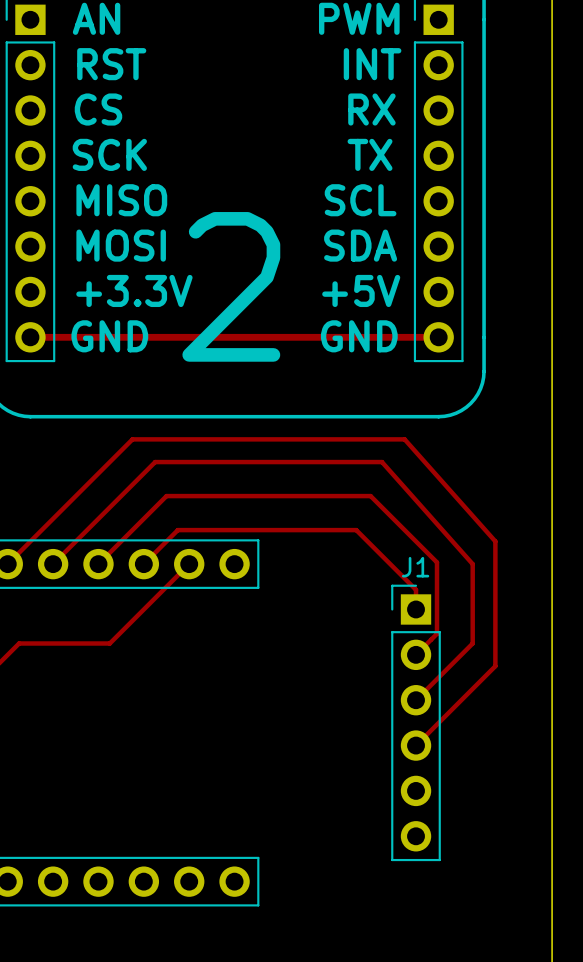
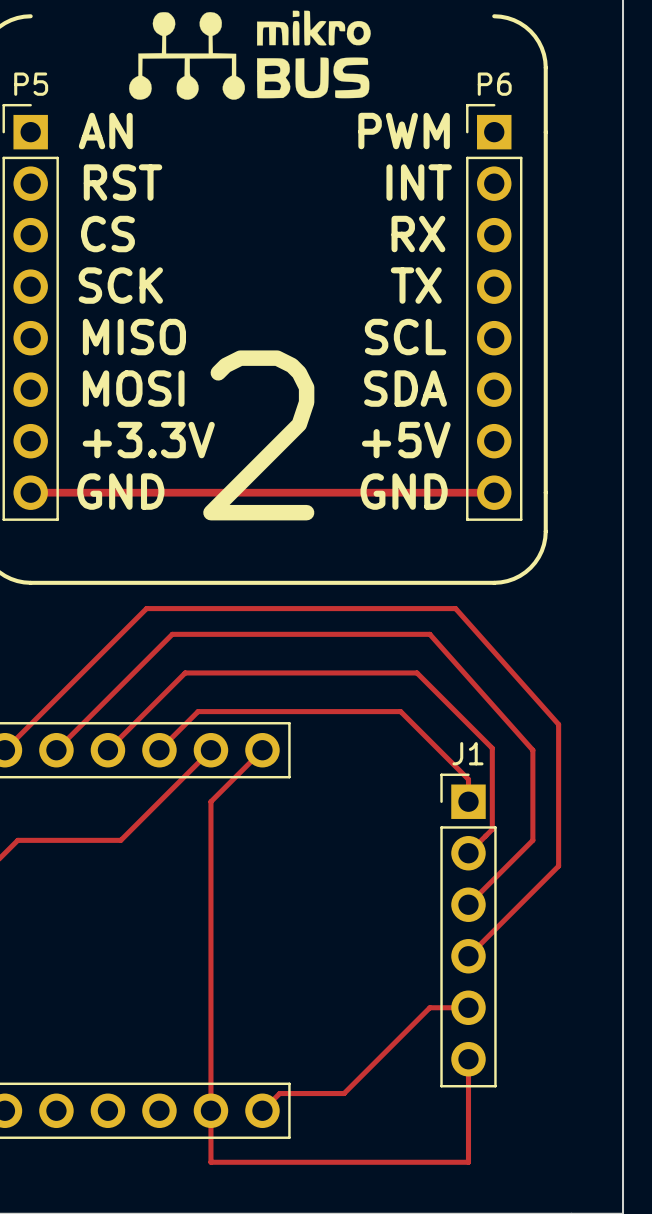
track: none -> (262, 750) (210, 801) (210, 1162) (468, 1162) (468, 1059)
track: none -> (468, 1007) (429, 1007) (344, 1093) (279, 1093) (262, 1110)

